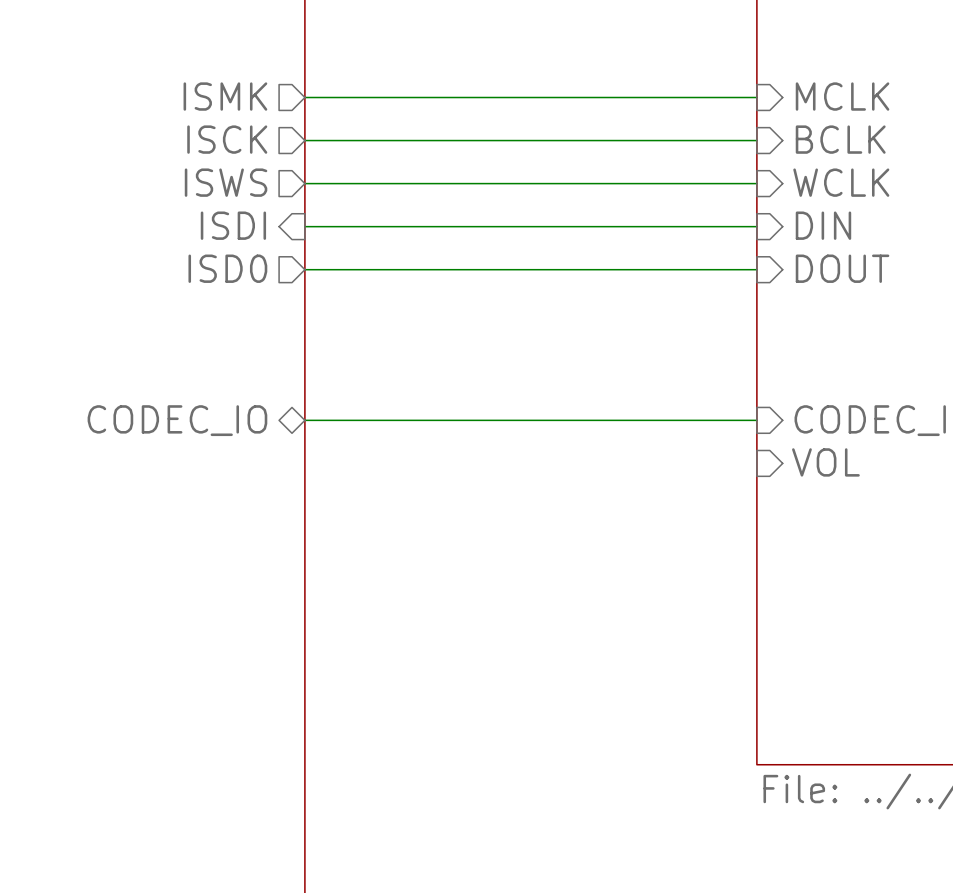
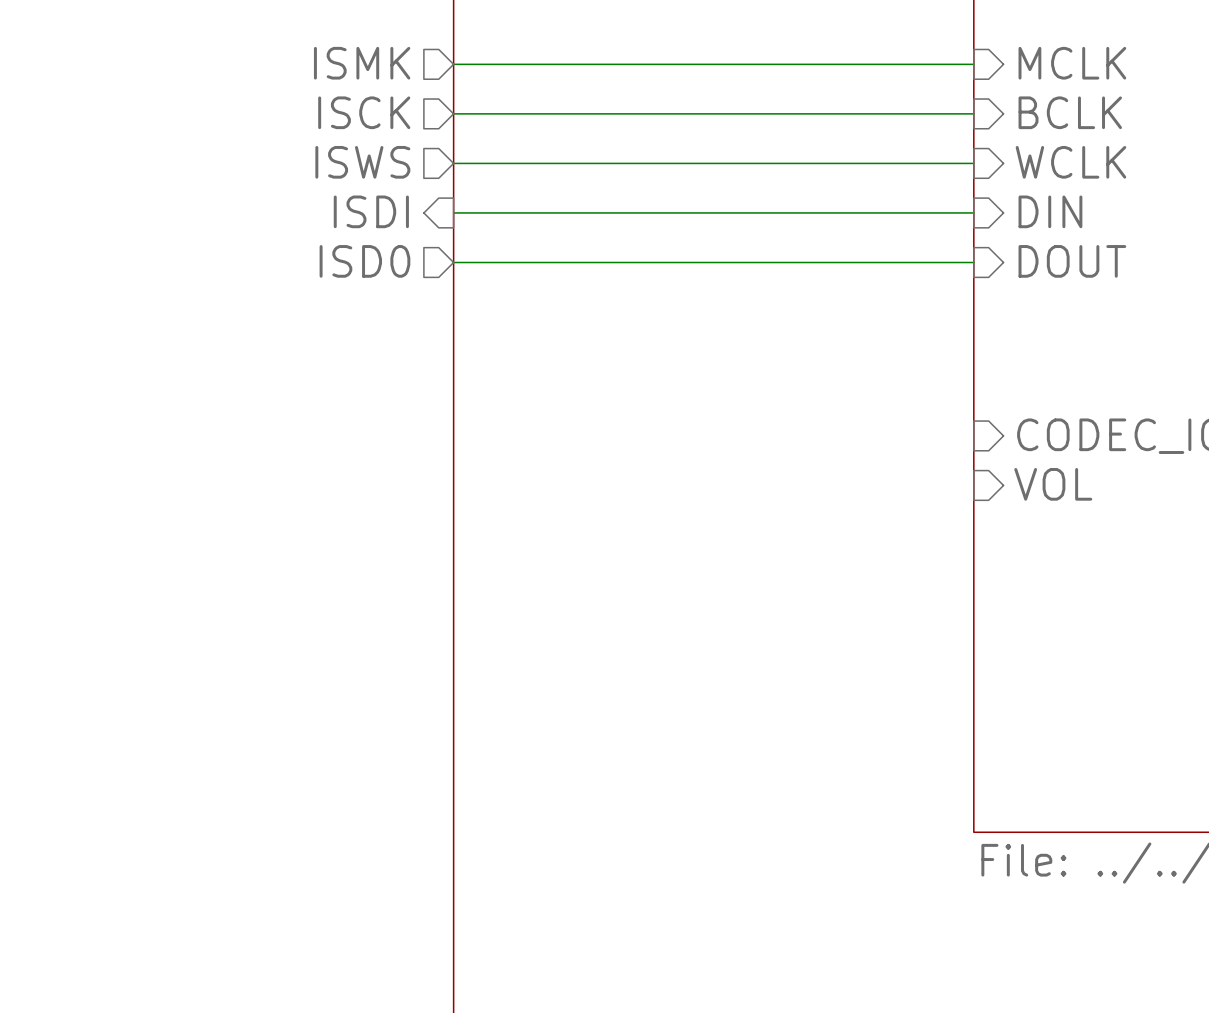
sheet pin: CODEC_IO (177, 420) -> none
wire: (304, 420) (756, 420) -> none

